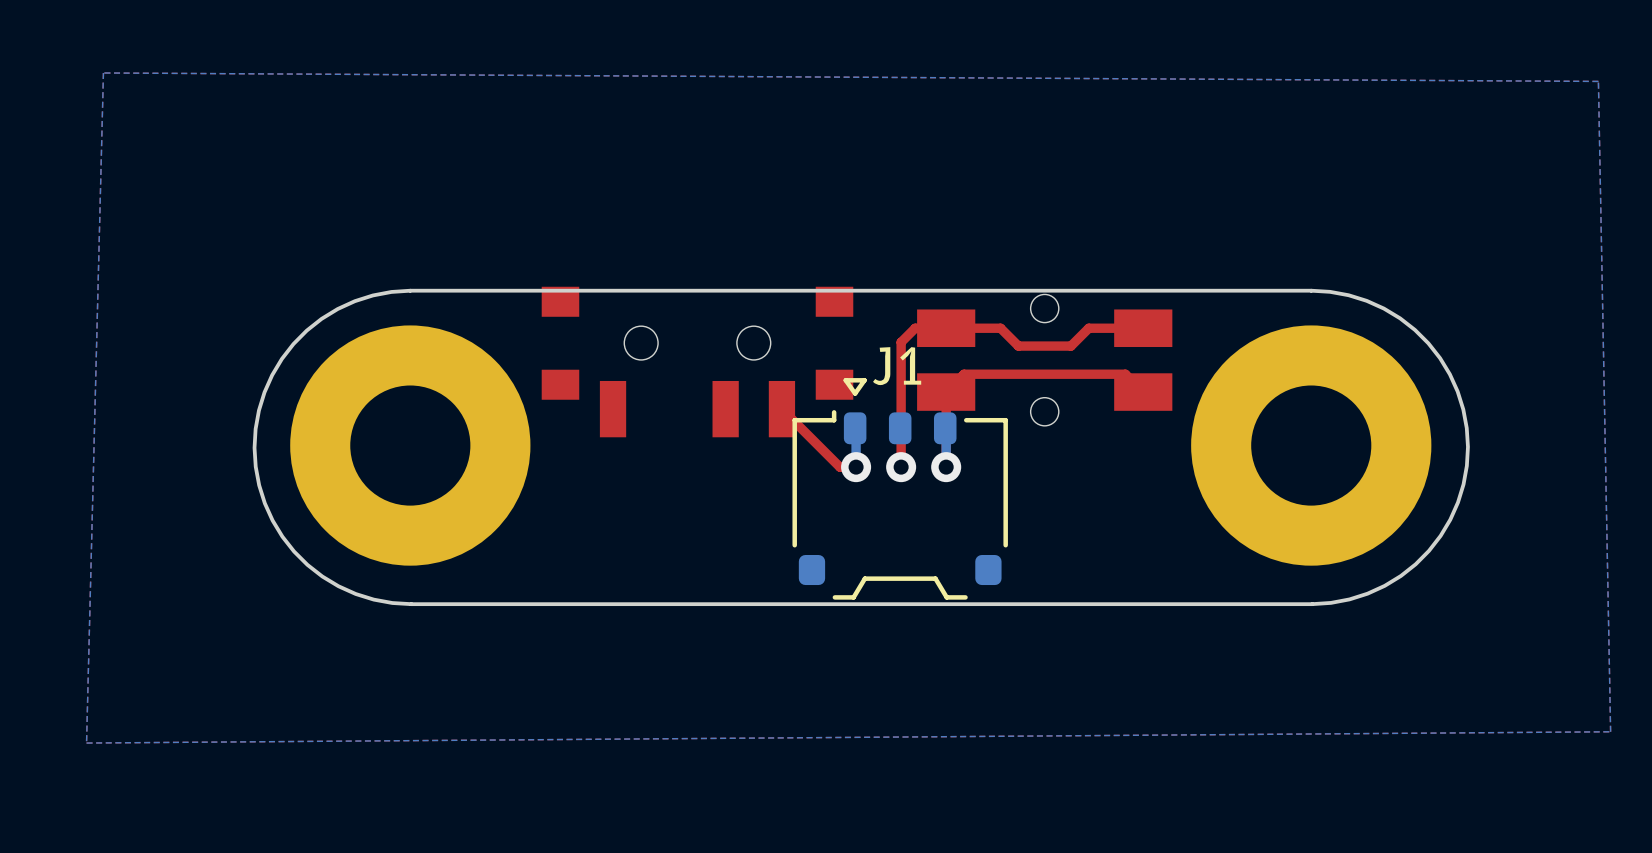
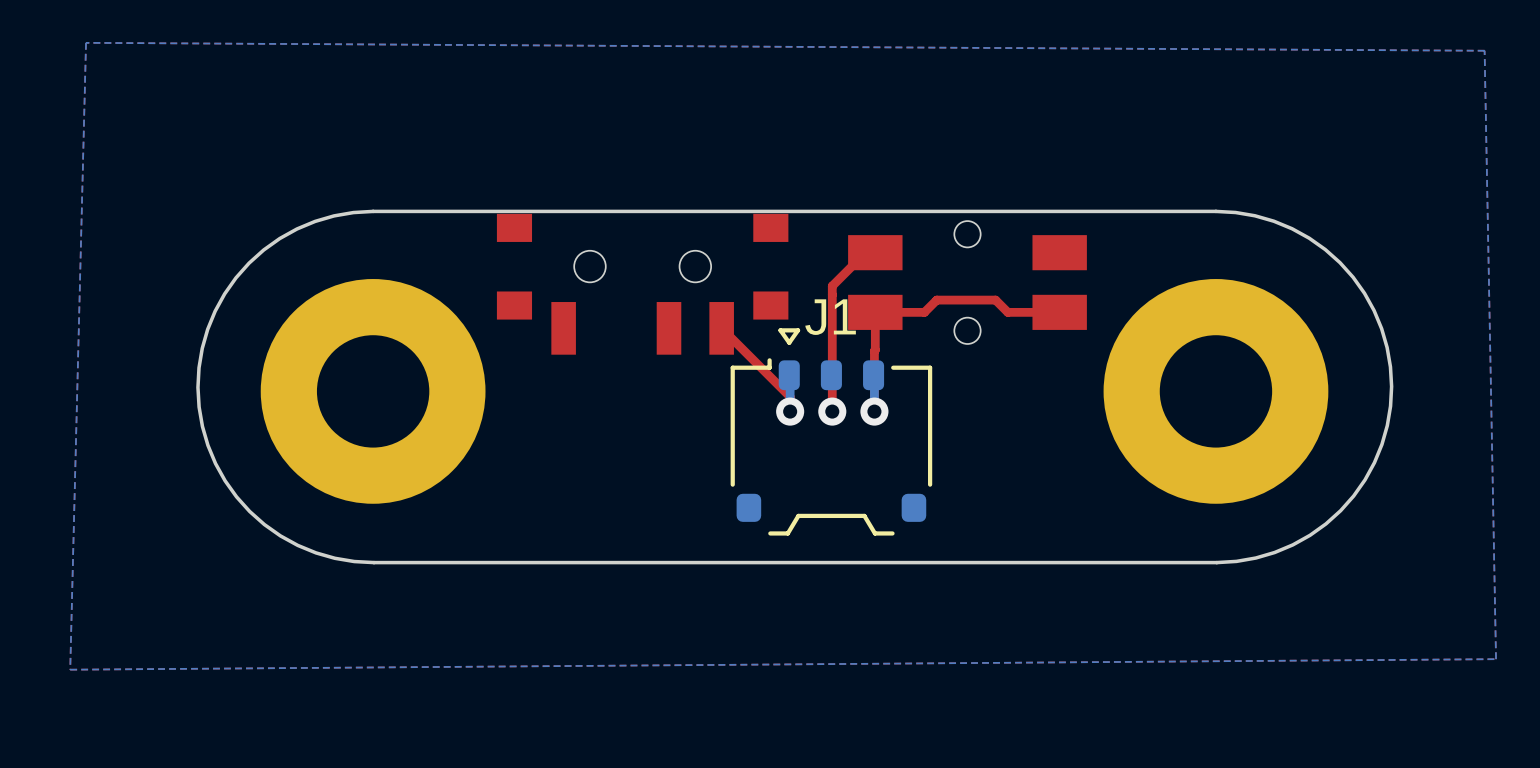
board edge: (1311, 290) (391, 291) (354, 301) (337, 309) (306, 330) (293, 344) (272, 375) (264, 392) (255, 429) (255, 466) (264, 503) (272, 520) (282, 536) (307, 564) (338, 586) (355, 594) (392, 603) (1331, 602) (1349, 599) (1384, 585) (1415, 564) (1429, 550) (1450, 519) (1457, 502) (1463, 484) (1467, 446) (1463, 409) (1449, 374) (1440, 358) (1415, 329) (1383, 308) (1366, 300) (1330, 291) (1311, 290) -> (1215, 211) (1235, 212) (1273, 221) (1309, 238) (1325, 249) (1353, 277) (1364, 293) (1381, 328) (1390, 366) (1391, 386) (1387, 425) (1374, 462) (1353, 496) (1326, 523) (1310, 535) (1274, 552) (1255, 558) (1216, 562) (354, 561) (315, 552) (280, 535) (264, 524) (236, 496) (225, 480) (207, 445) (202, 426) (199, 407) (199, 367) (207, 329) (224, 293) (249, 263) (279, 238) (296, 228) (334, 215) (373, 211) (1215, 211)
top track: (1143, 328) (1088, 328) (1070, 346) (1018, 346) (1000, 328) (915, 328) (901, 342) -> (875, 252) (865, 252) (832, 286) (832, 294)
part position: (1044, 360) -> (967, 282)
part position: (697, 362) -> (642, 284)
top track: (1143, 392) (1125, 374) (964, 374) (946, 392) (946, 402) -> (1059, 312) (1007, 312) (995, 300) (936, 300) (924, 312) (875, 312) (874, 351)
top track: (781, 409) (839, 467) (856, 467) -> (721, 328) (790, 396) (790, 411)

